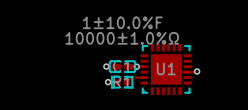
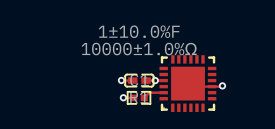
U1 name: U1 (166, 69) -> none

